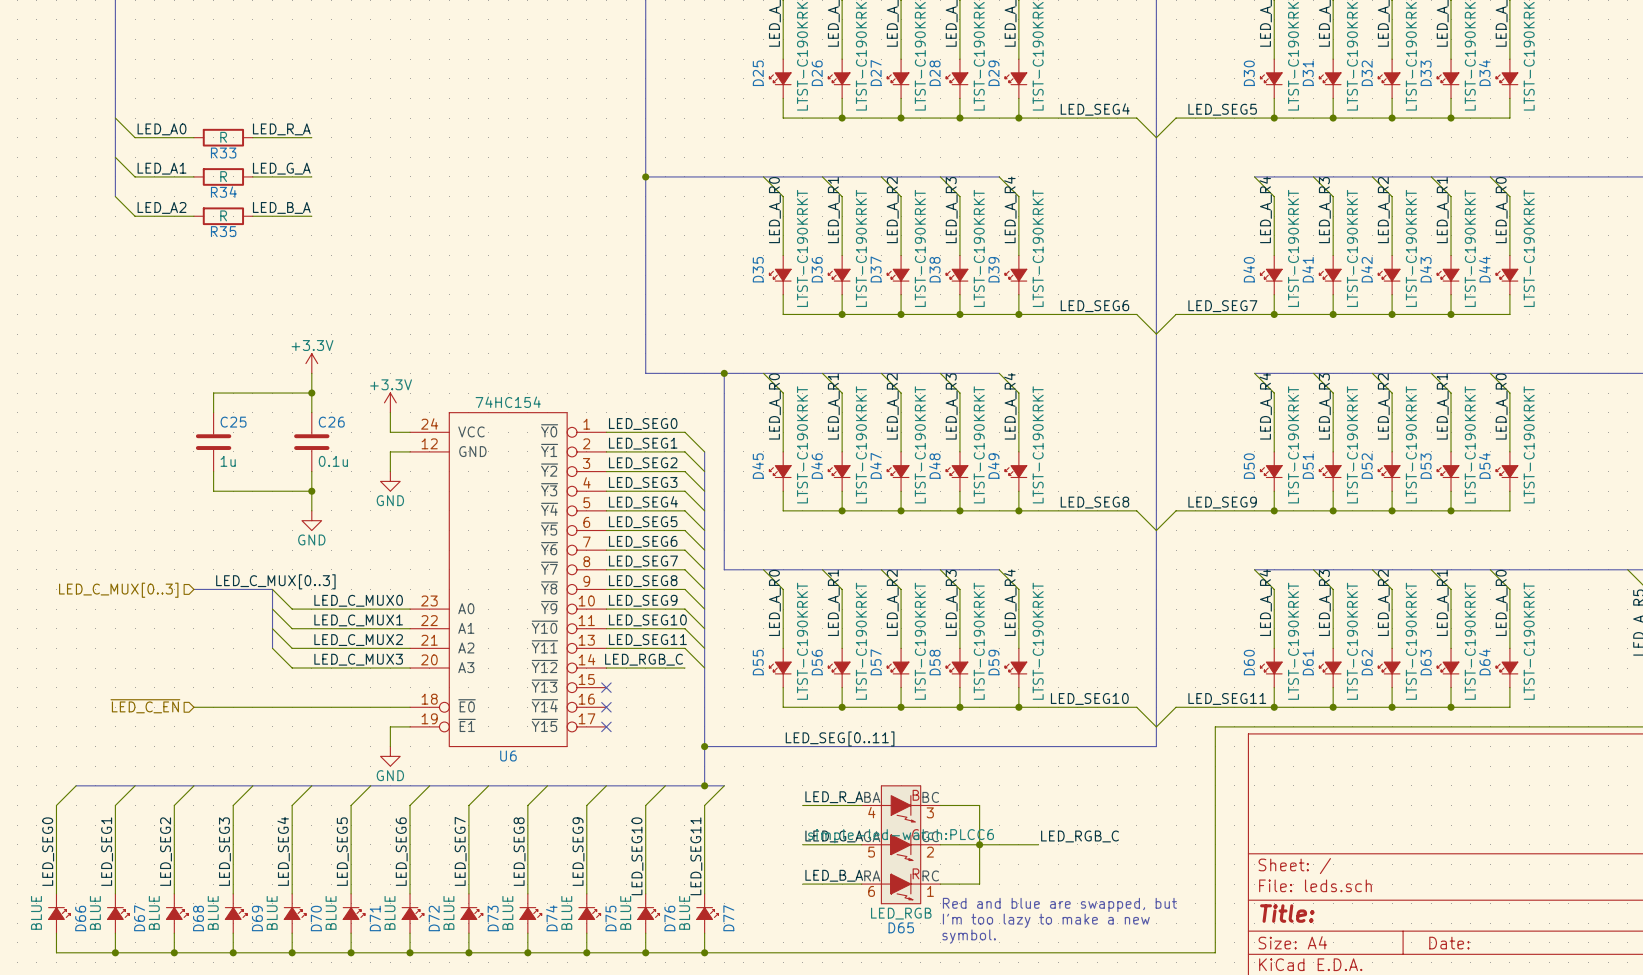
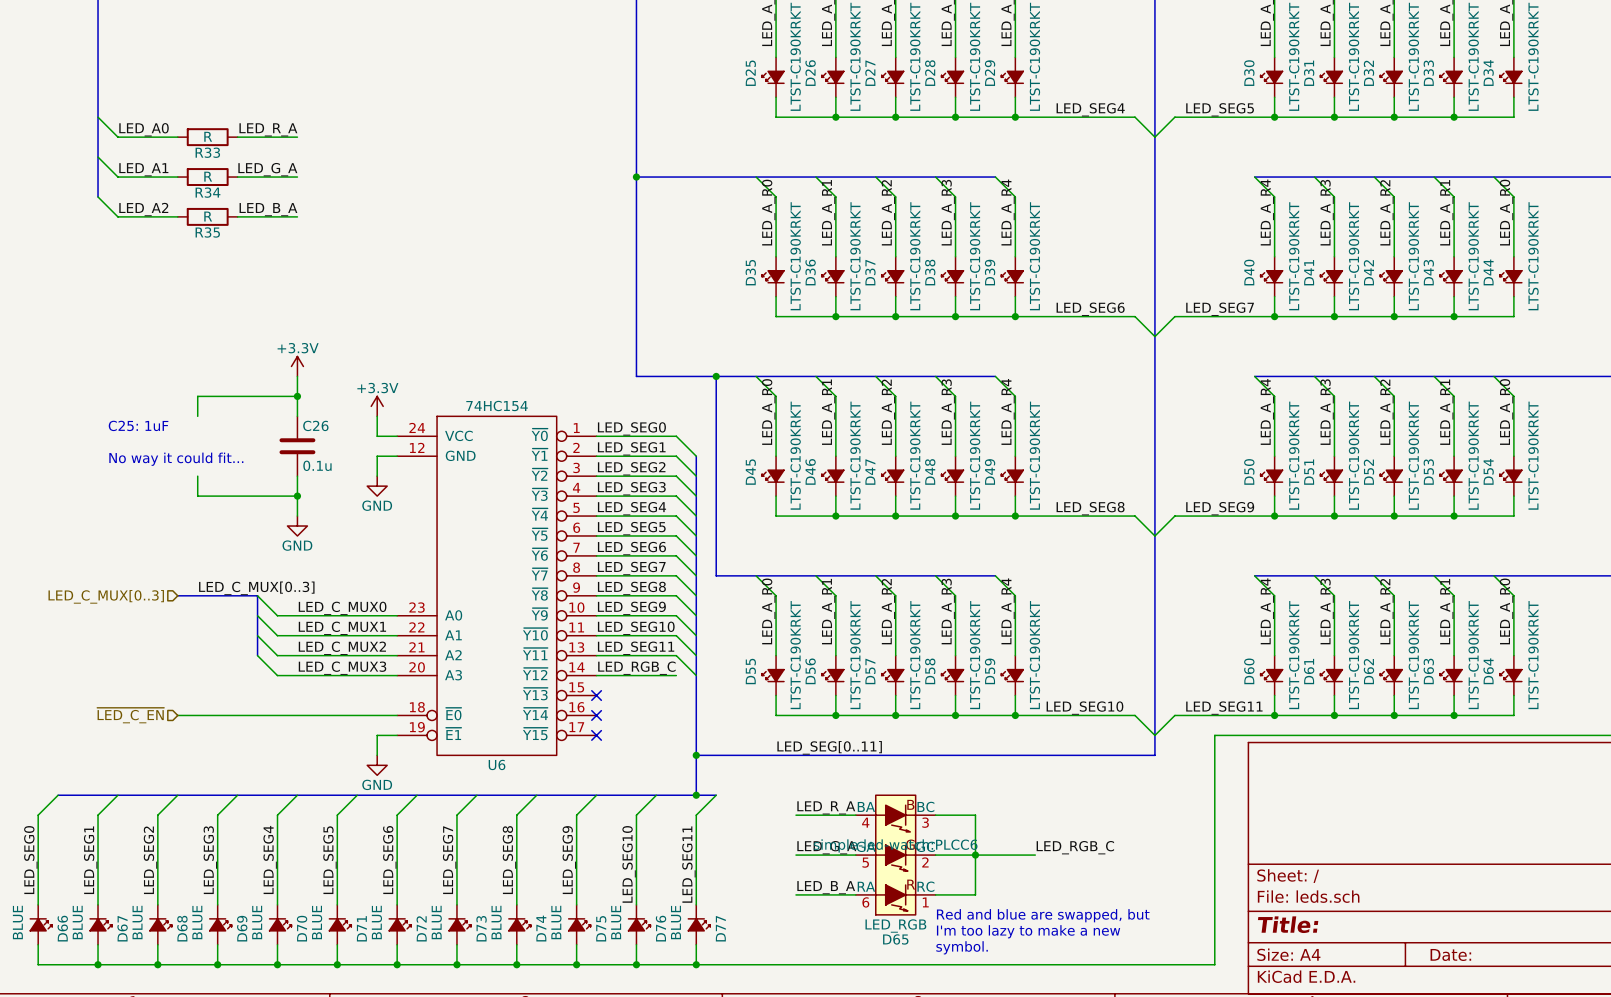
text: none -> C25: 1uF (138, 425)
C25: 1u (213, 442) -> none
text: none -> No way it could fit... (176, 459)

